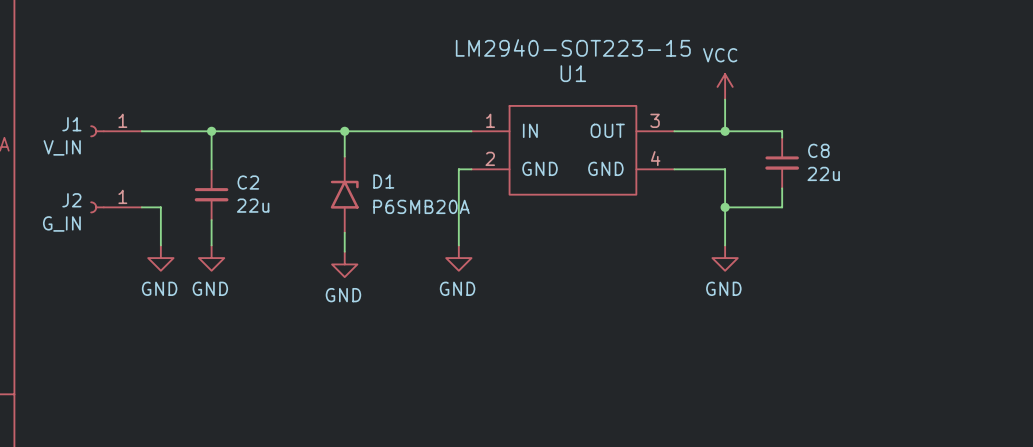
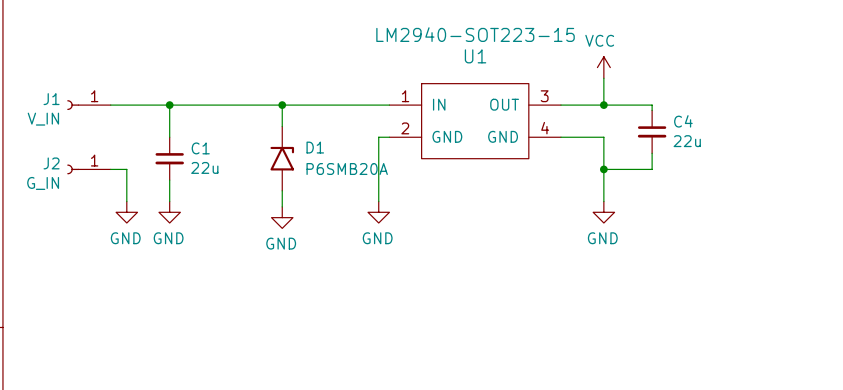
C8 name: C8 (818, 150) -> C4 (683, 121)
C2 name: C2 (248, 182) -> C1 (200, 148)

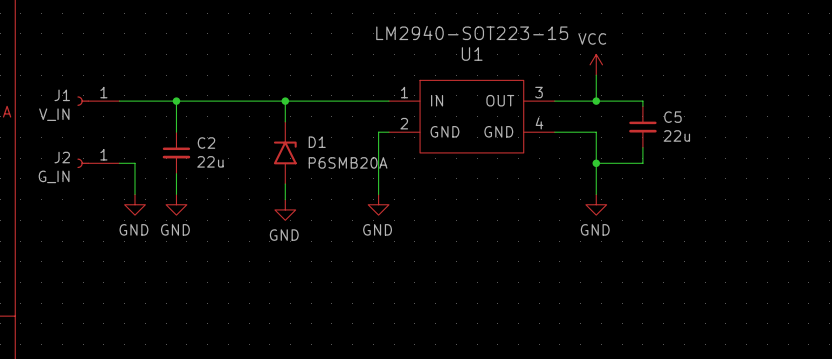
C4 name: C4 (683, 121) -> C5 (672, 117)
C1 name: C1 (200, 148) -> C2 (206, 143)

